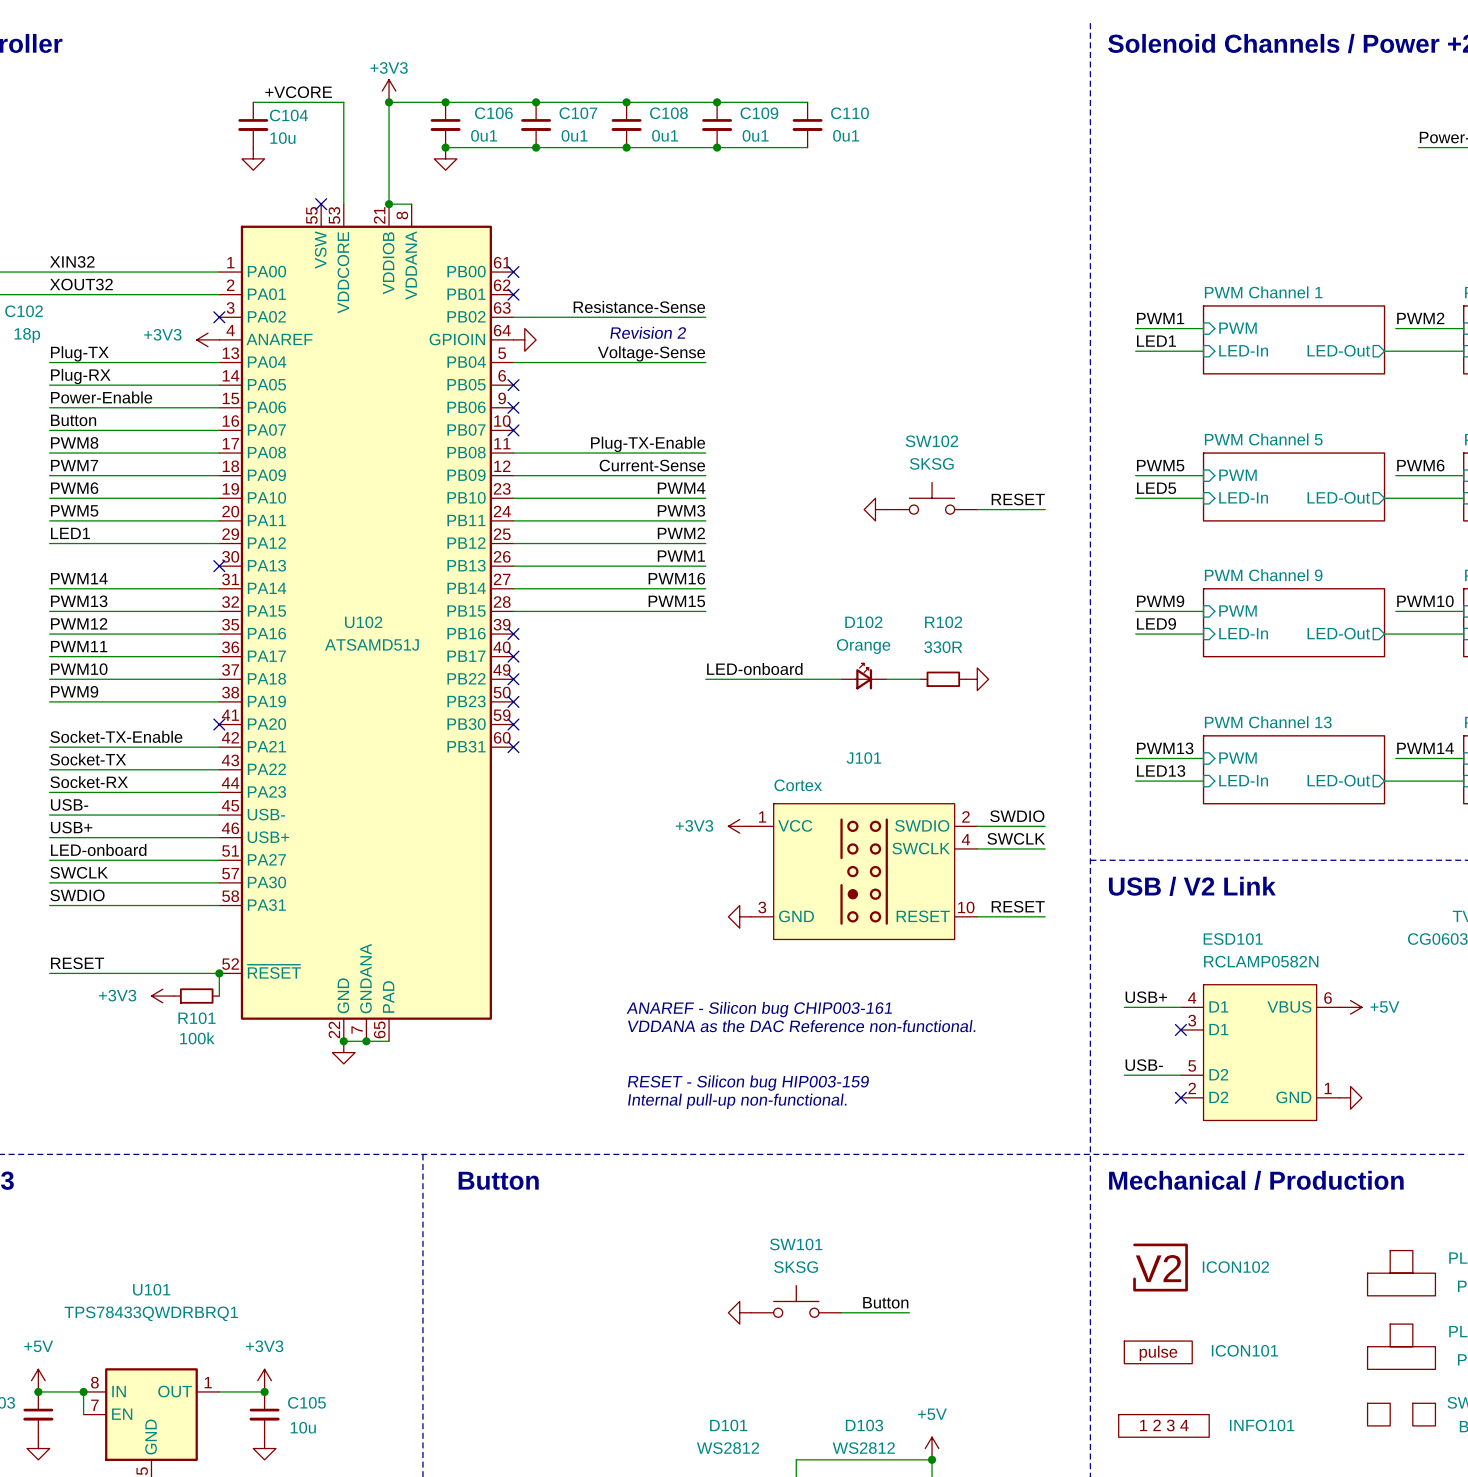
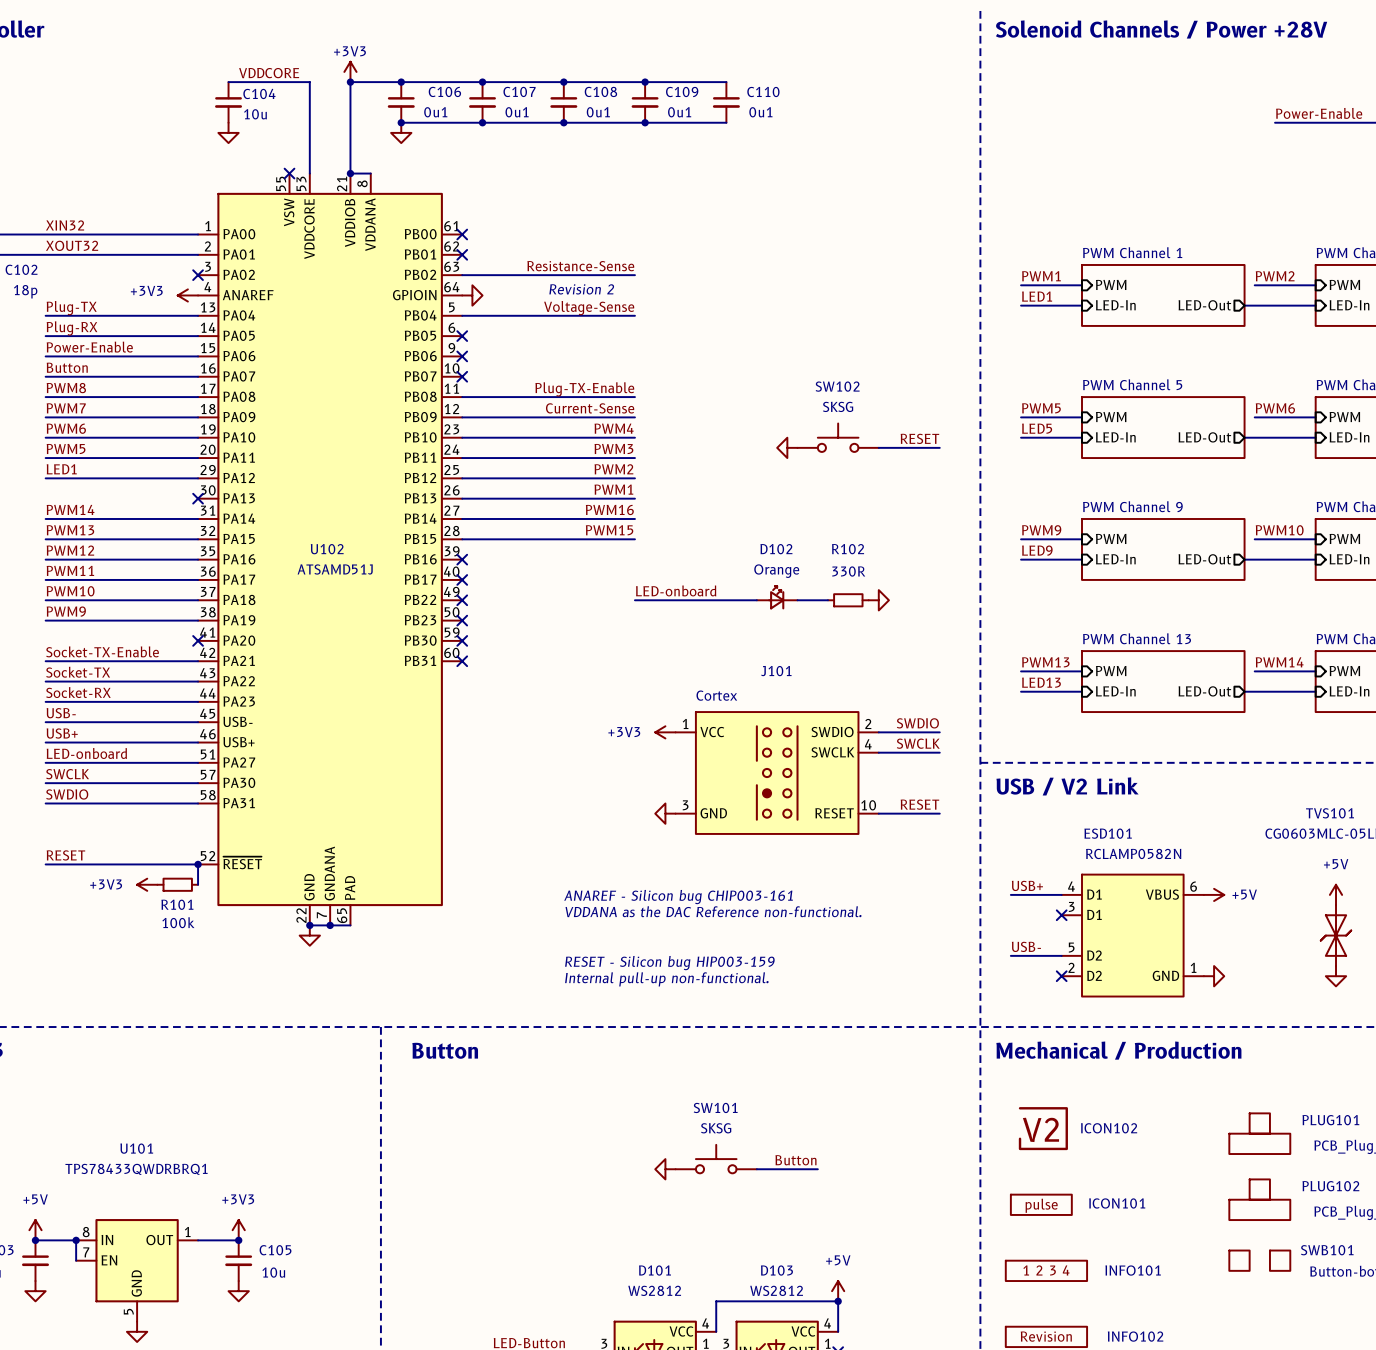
label: +VCORE (298, 92) -> VDDCORE (269, 73)

